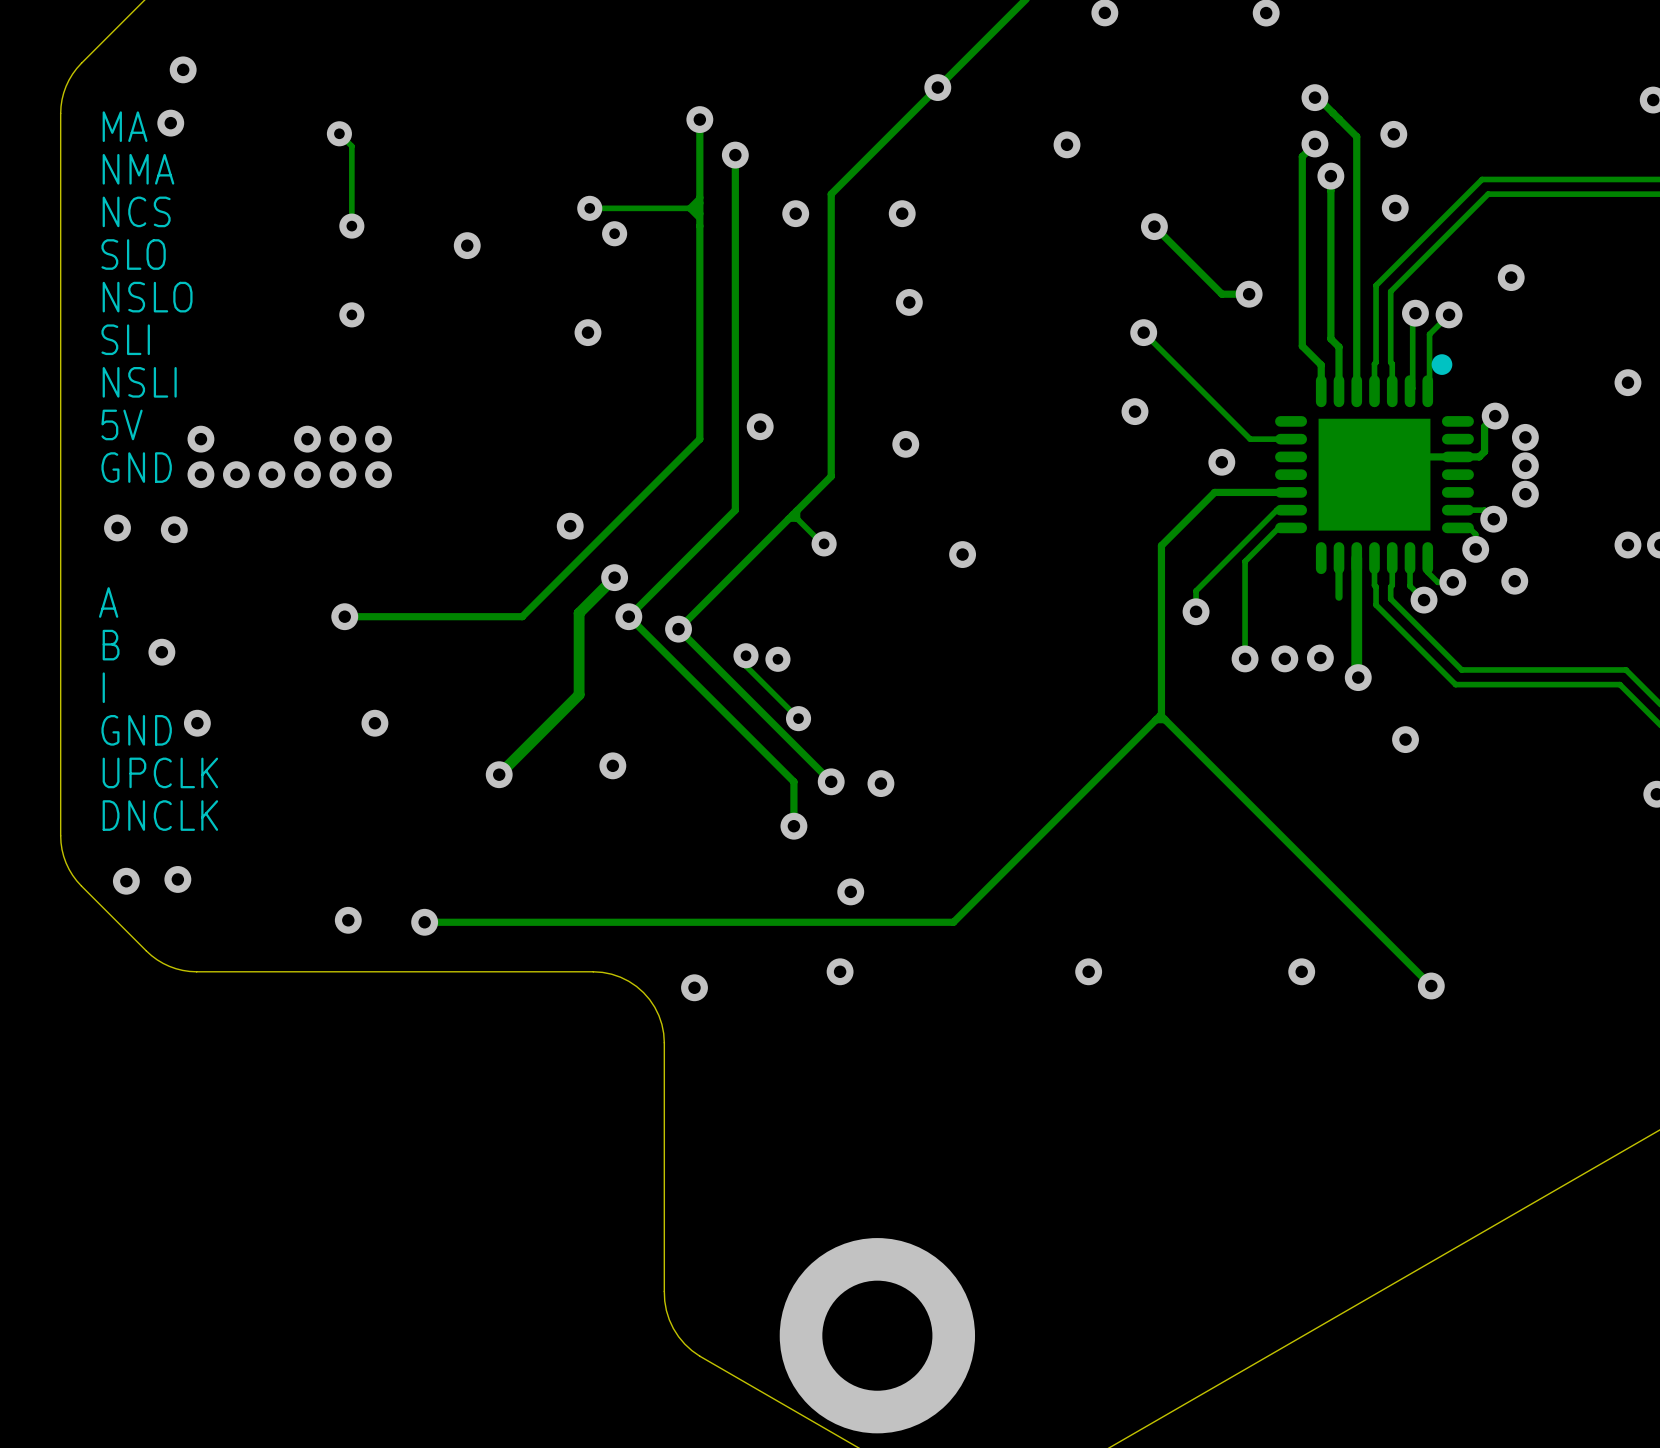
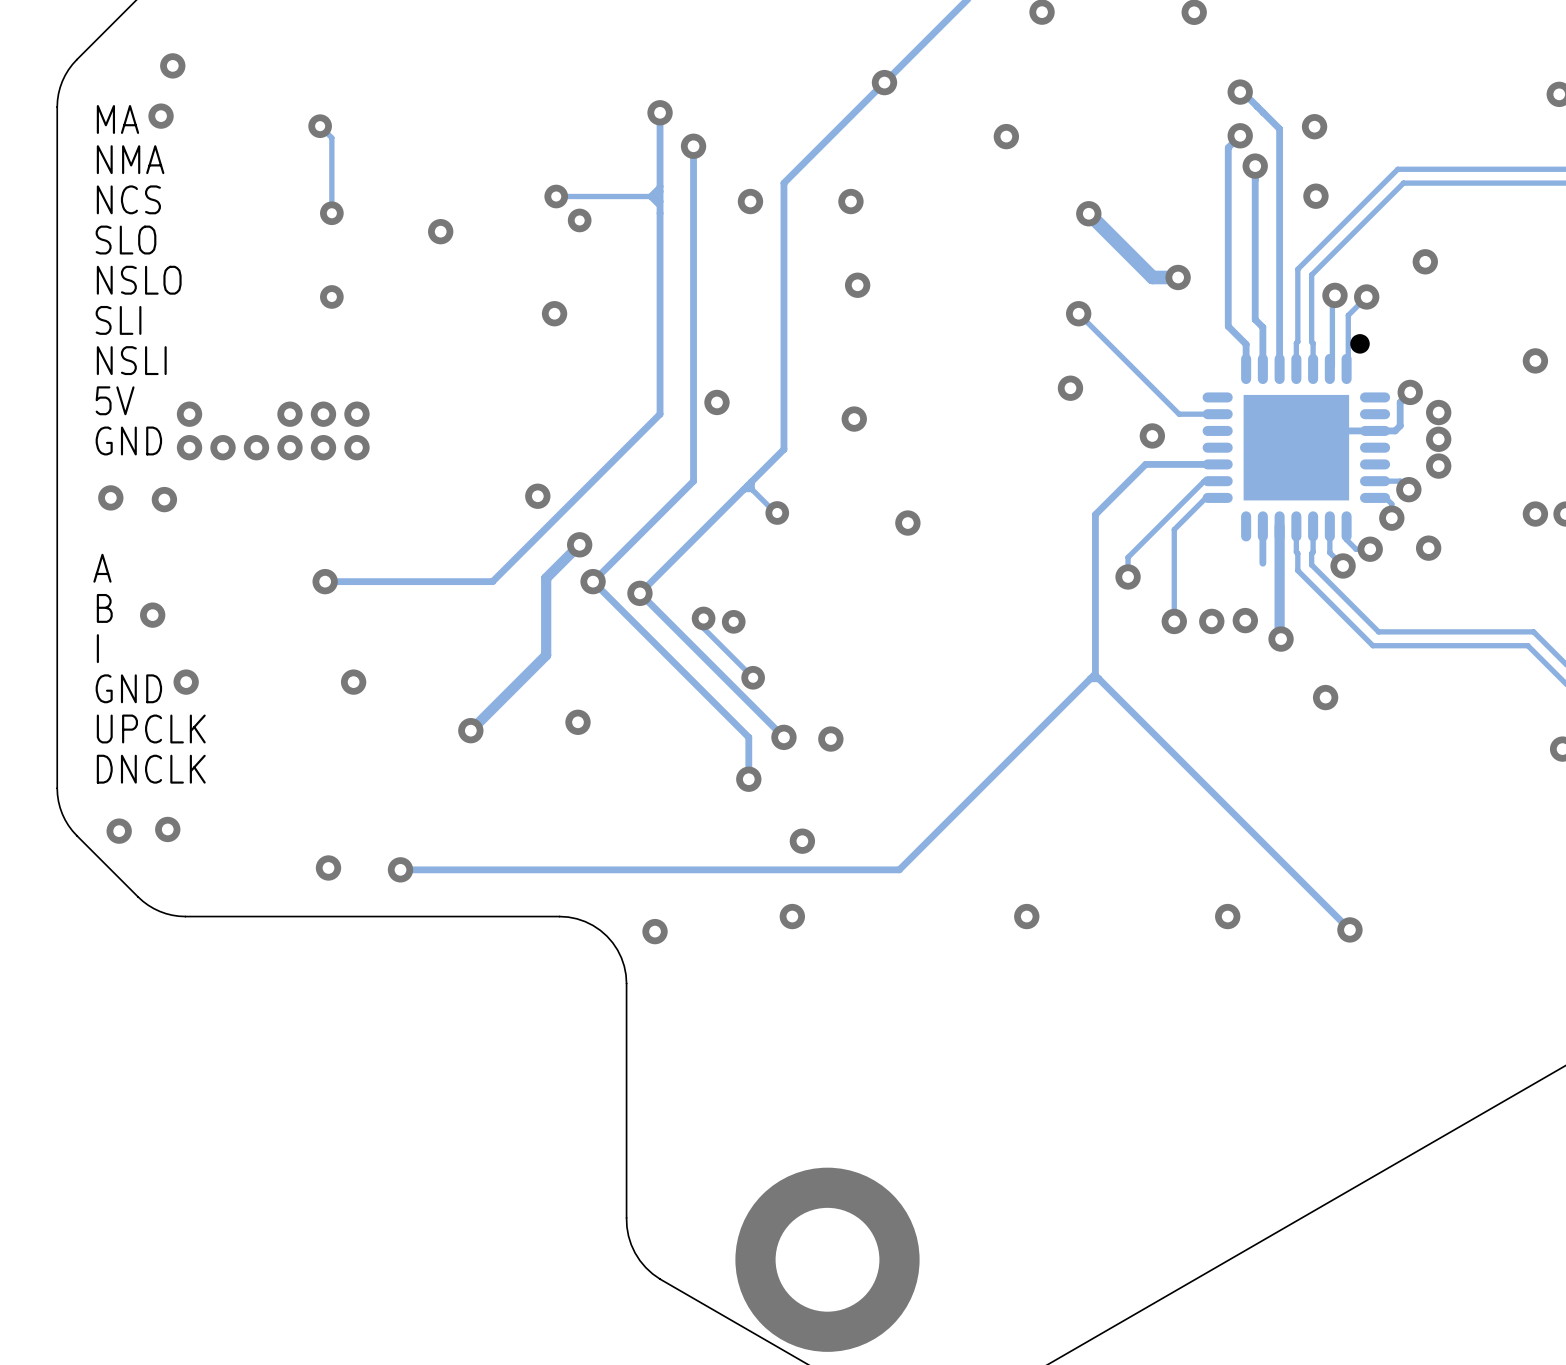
track width: thin (1154, 226) (1222, 294) (1249, 294) -> thick (1088, 213) (1152, 277) (1178, 277)

